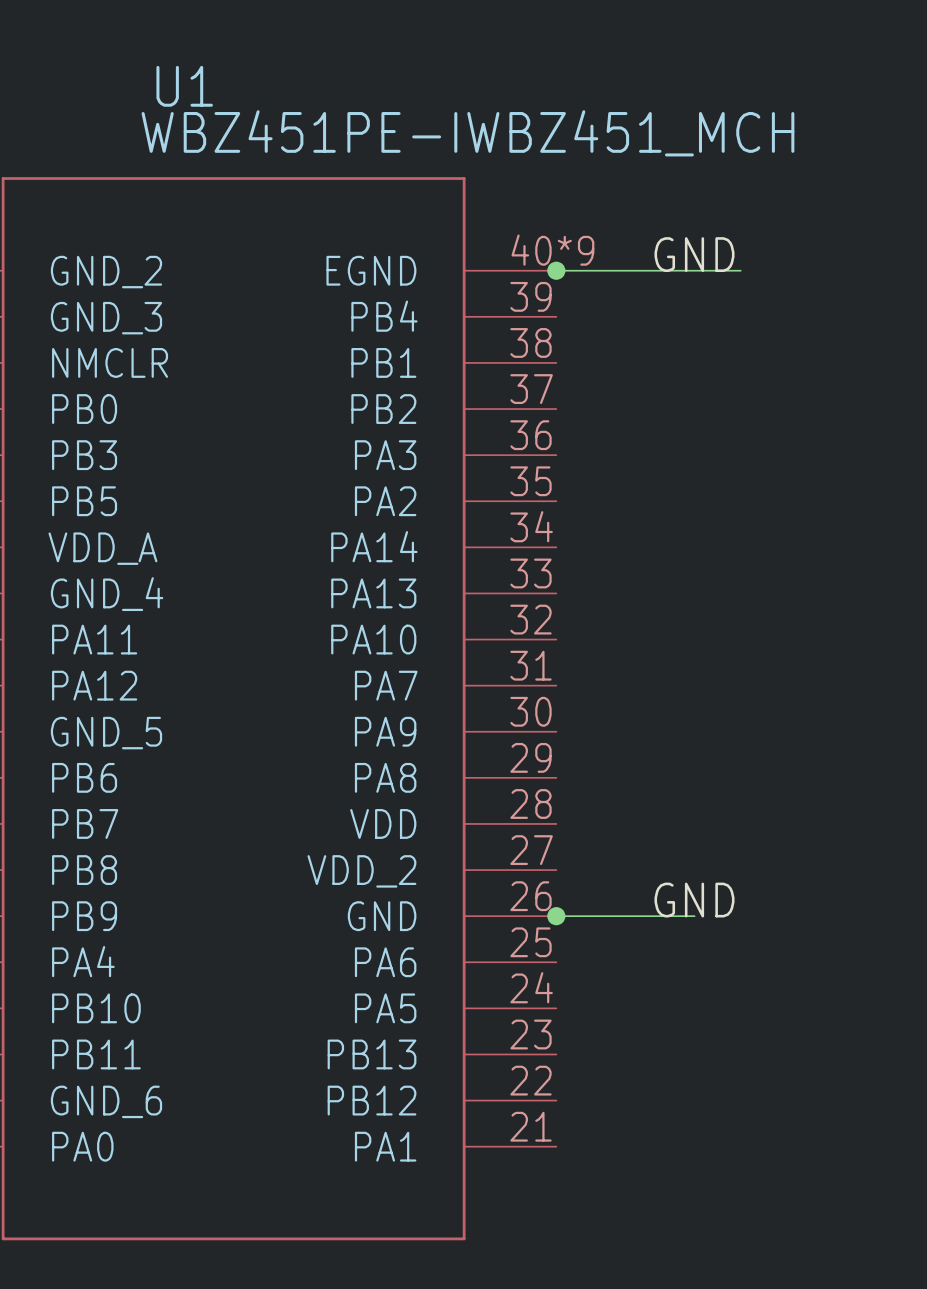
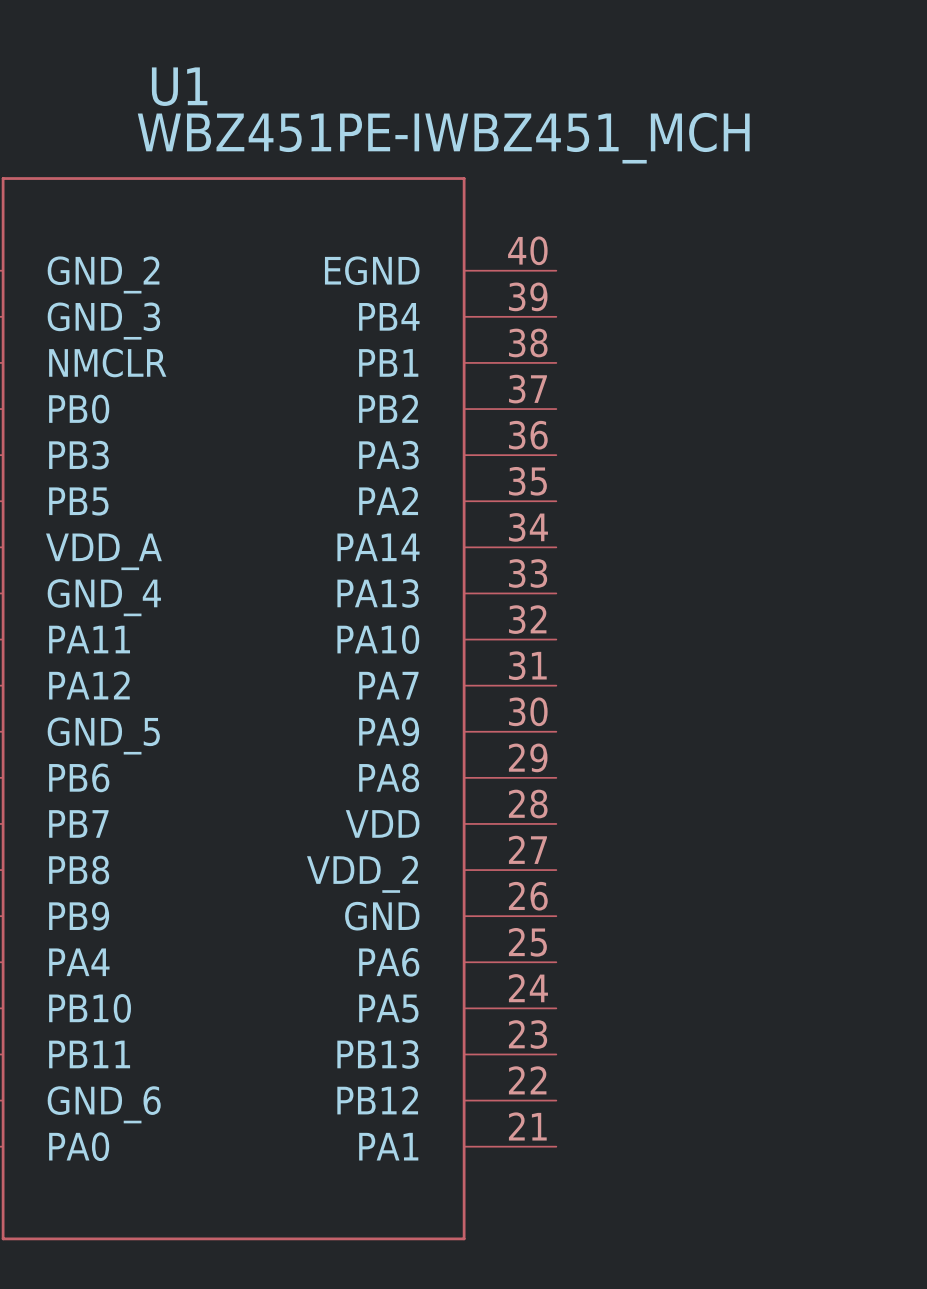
U1 pin number: 40*9 (552, 250) -> 40 (527, 250)
label: GND (694, 254) -> none
wire: (556, 270) (740, 270) -> none
junction: (556, 270) -> none
label: GND (694, 900) -> none
wire: (556, 916) (694, 916) -> none
junction: (556, 916) -> none

